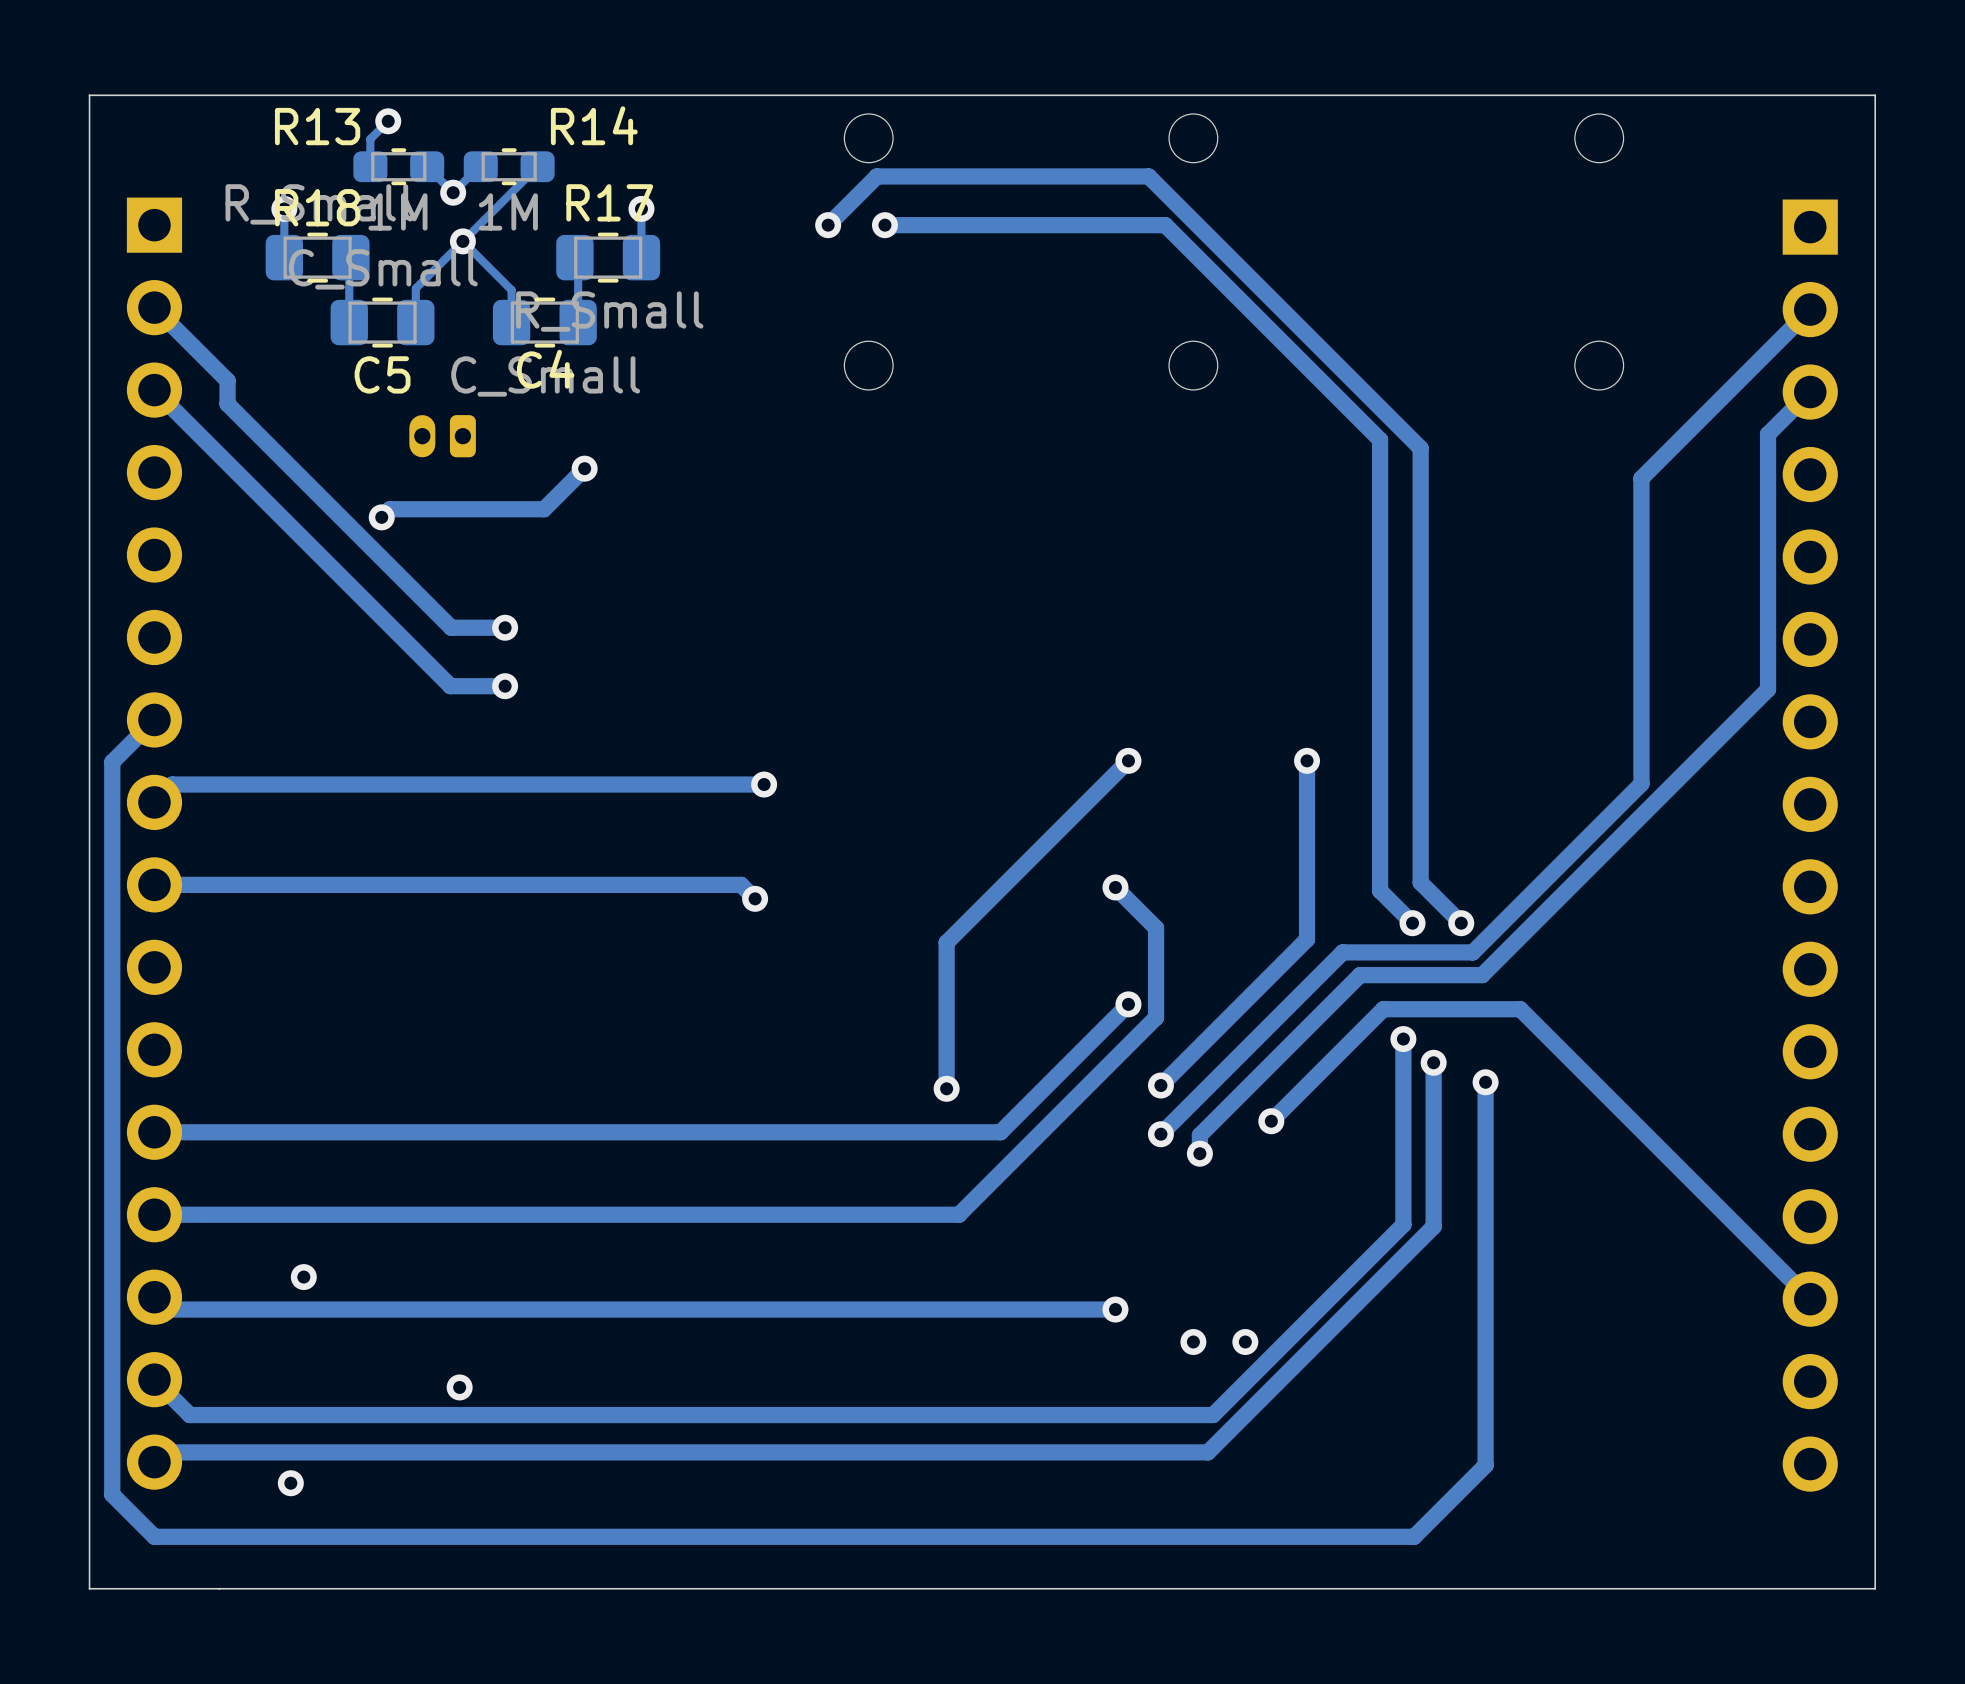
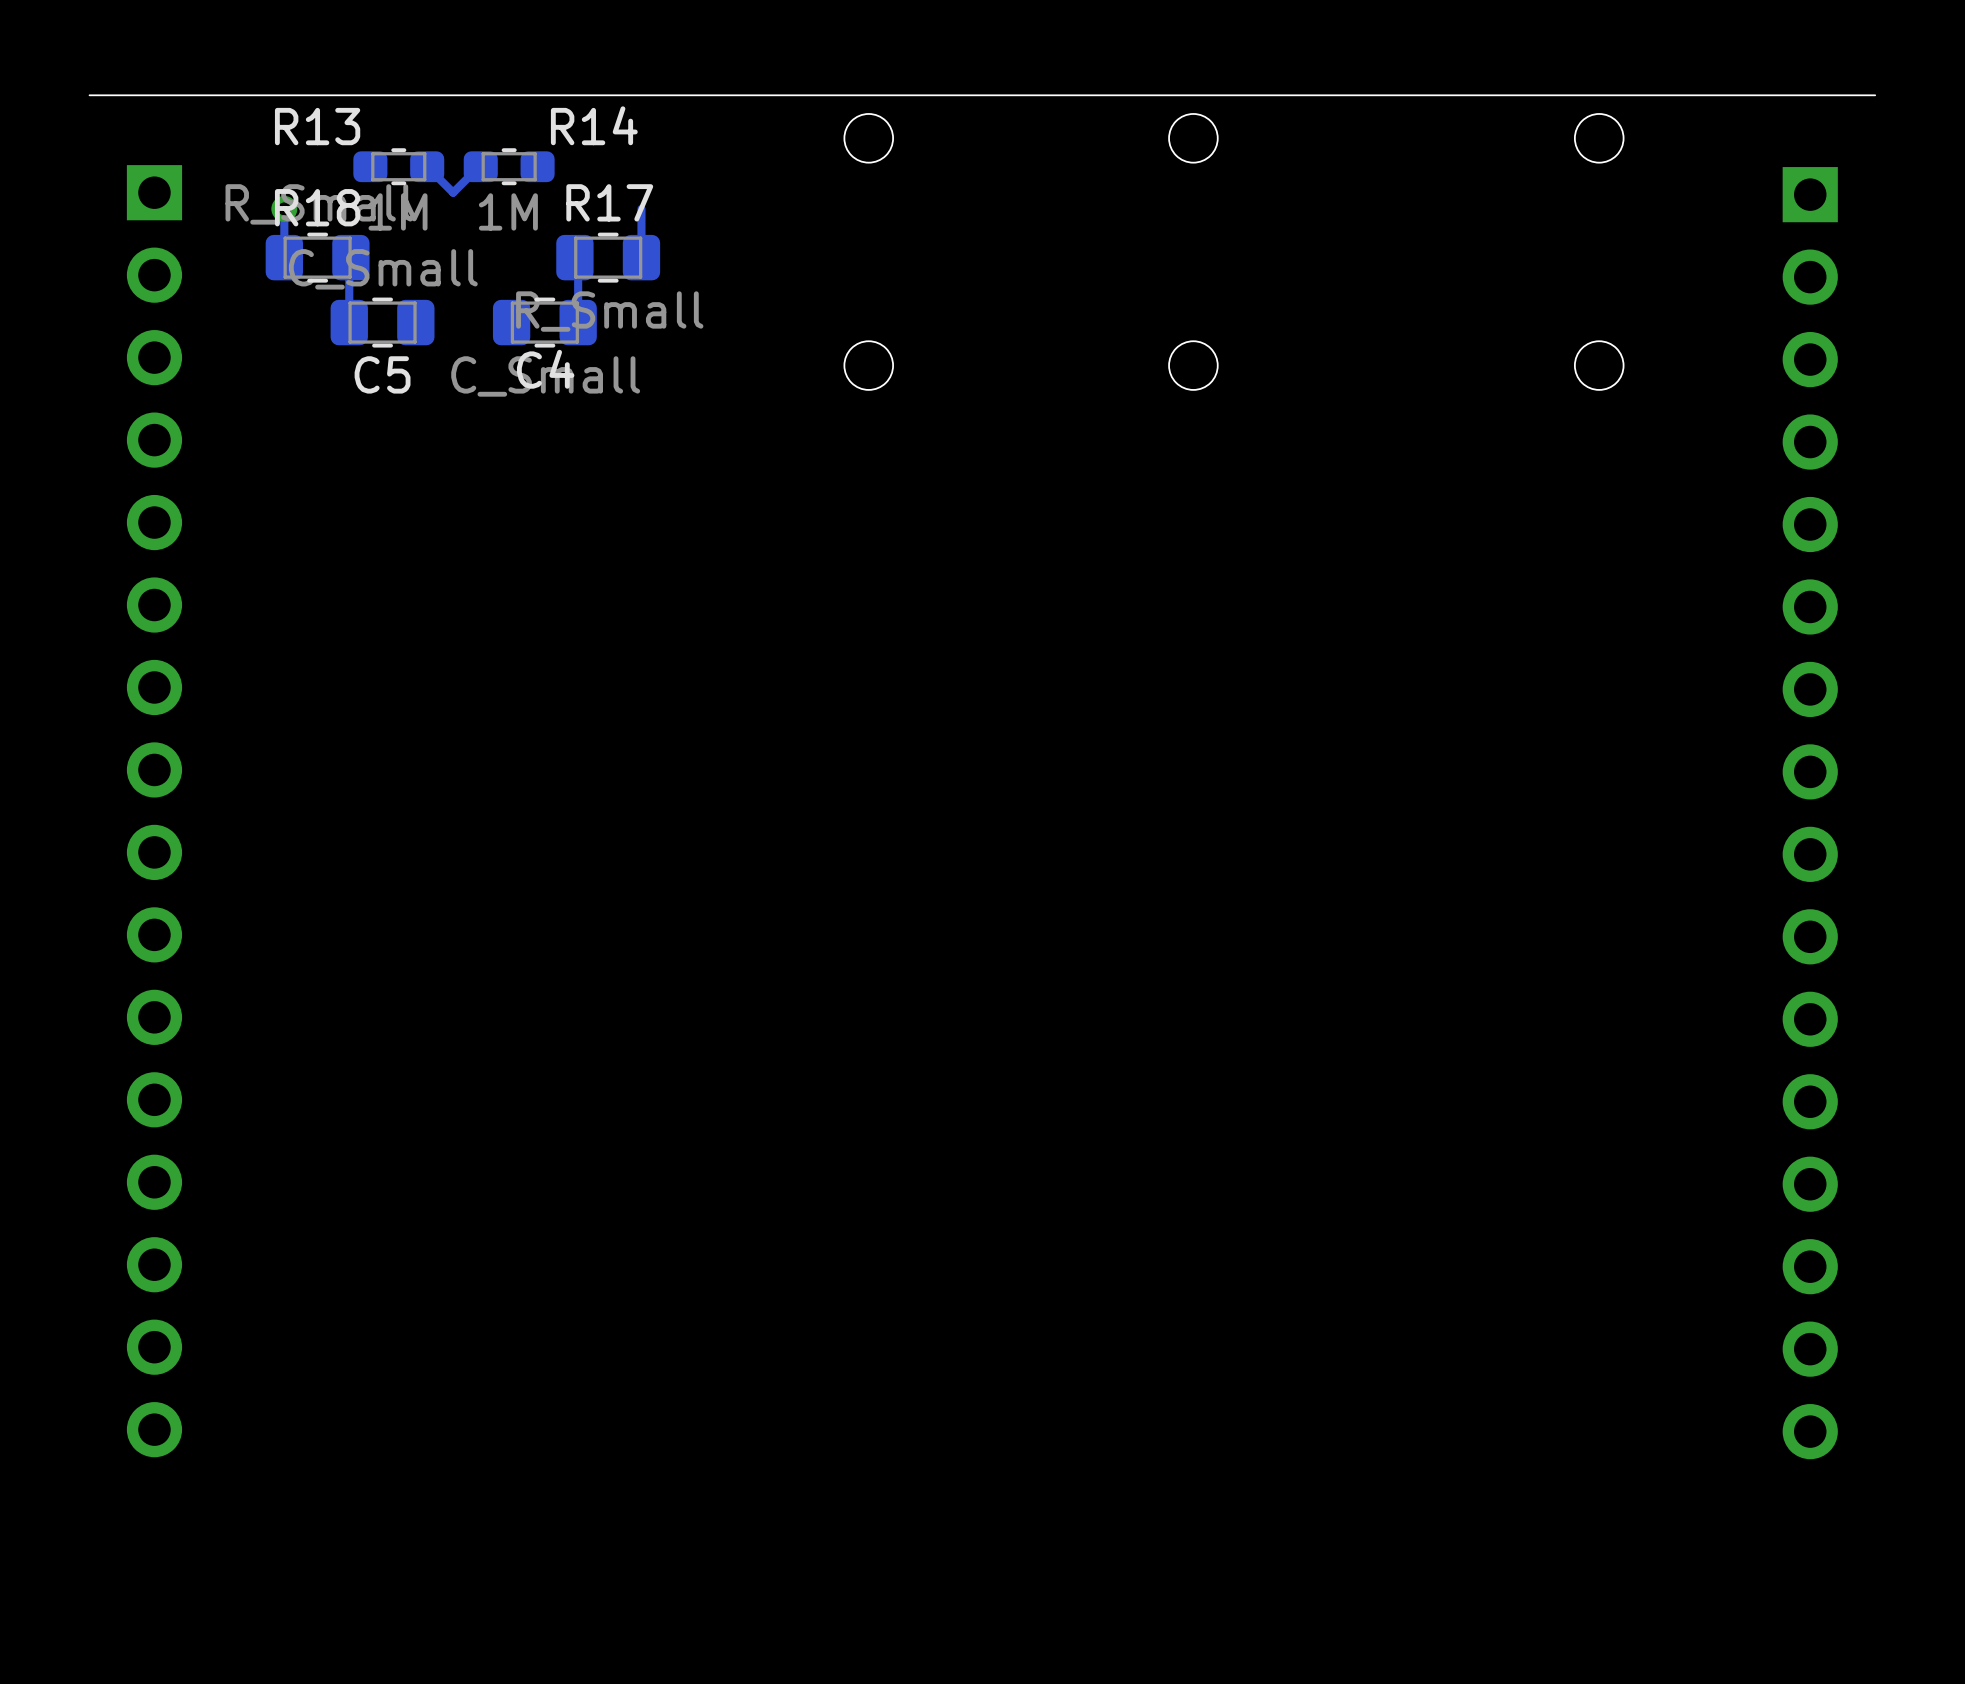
board edge: (1875, 95) (1875, 1588) (89, 1588) (89, 95) -> none
track: (388, 121) (370, 139) (370, 166) -> none
via: (388, 121) -> none
track: (537, 166) (415, 288) (415, 322) -> none
via: (453, 192) -> none
via: (641, 208) -> none
track: (828, 225) (876, 176) (1148, 176) (1420, 448) (1420, 882) (1461, 923) -> none
via: (828, 225) -> none
track: (884, 225) (1165, 225) (1380, 439) (1380, 890) (1412, 923) -> none
via: (884, 225) -> none
track: (462, 241) (511, 290) (511, 322) -> none
via: (462, 241) -> none
track: (154, 307) (227, 380) (227, 403) (451, 627) (505, 627) -> none
track: (1810, 309) (1641, 478) (1641, 783) (1472, 952) (1342, 952) (1160, 1134) -> none
track: (154, 390) (450, 686) (505, 686) -> none
track: (1810, 392) (1768, 434) (1768, 689) (1482, 975) (1360, 975) (1199, 1135) (1199, 1153) -> none
part: (442, 436) -> none
track: (584, 468) (544, 509) (389, 509) (381, 517) -> none
via: (584, 468) -> none
via: (381, 517) -> none
via: (505, 627) -> none
via: (505, 686) -> none
track: (154, 719) (112, 762) (112, 1494) (154, 1536) (1414, 1536) (1485, 1465) (1485, 1082) -> none
track: (1128, 760) (946, 942) (946, 1088) -> none
via: (1128, 760) -> none
track: (1307, 760) (1307, 939) (1160, 1085) -> none
via: (1307, 760) -> none
track: (764, 784) (172, 784) (154, 802) -> none
via: (764, 784) -> none
part position: (154, 843) -> (154, 811)
part position: (1810, 845) -> (1810, 813)
track: (154, 884) (741, 884) (755, 898) -> none
track: (1115, 887) (1156, 928) (1156, 1017) (958, 1214) (154, 1214) -> none
via: (1115, 887) -> none
via: (755, 898) -> none
via: (1412, 923) -> none
via: (1461, 923) -> none
track: (1128, 1004) (1000, 1132) (154, 1132) -> none
via: (1128, 1004) -> none
track: (1403, 1039) (1403, 1224) (1213, 1415) (189, 1415) (154, 1379) -> none
via: (1403, 1039) -> none
track: (1433, 1062) (1433, 1226) (1207, 1452) (164, 1452) (154, 1462) -> none
via: (1433, 1062) -> none
via: (1485, 1082) -> none
via: (1160, 1085) -> none
via: (946, 1088) -> none
track: (1271, 1121) (1383, 1009) (1520, 1009) (1810, 1299) -> none
via: (1271, 1121) -> none
via: (1160, 1134) -> none
via: (1199, 1153) -> none
via: (303, 1277) -> none
track: (154, 1297) (166, 1309) (1115, 1309) -> none
via: (1115, 1309) -> none
via: (1193, 1342) -> none
via: (1245, 1342) -> none
via: (459, 1387) -> none
via: (290, 1483) -> none

